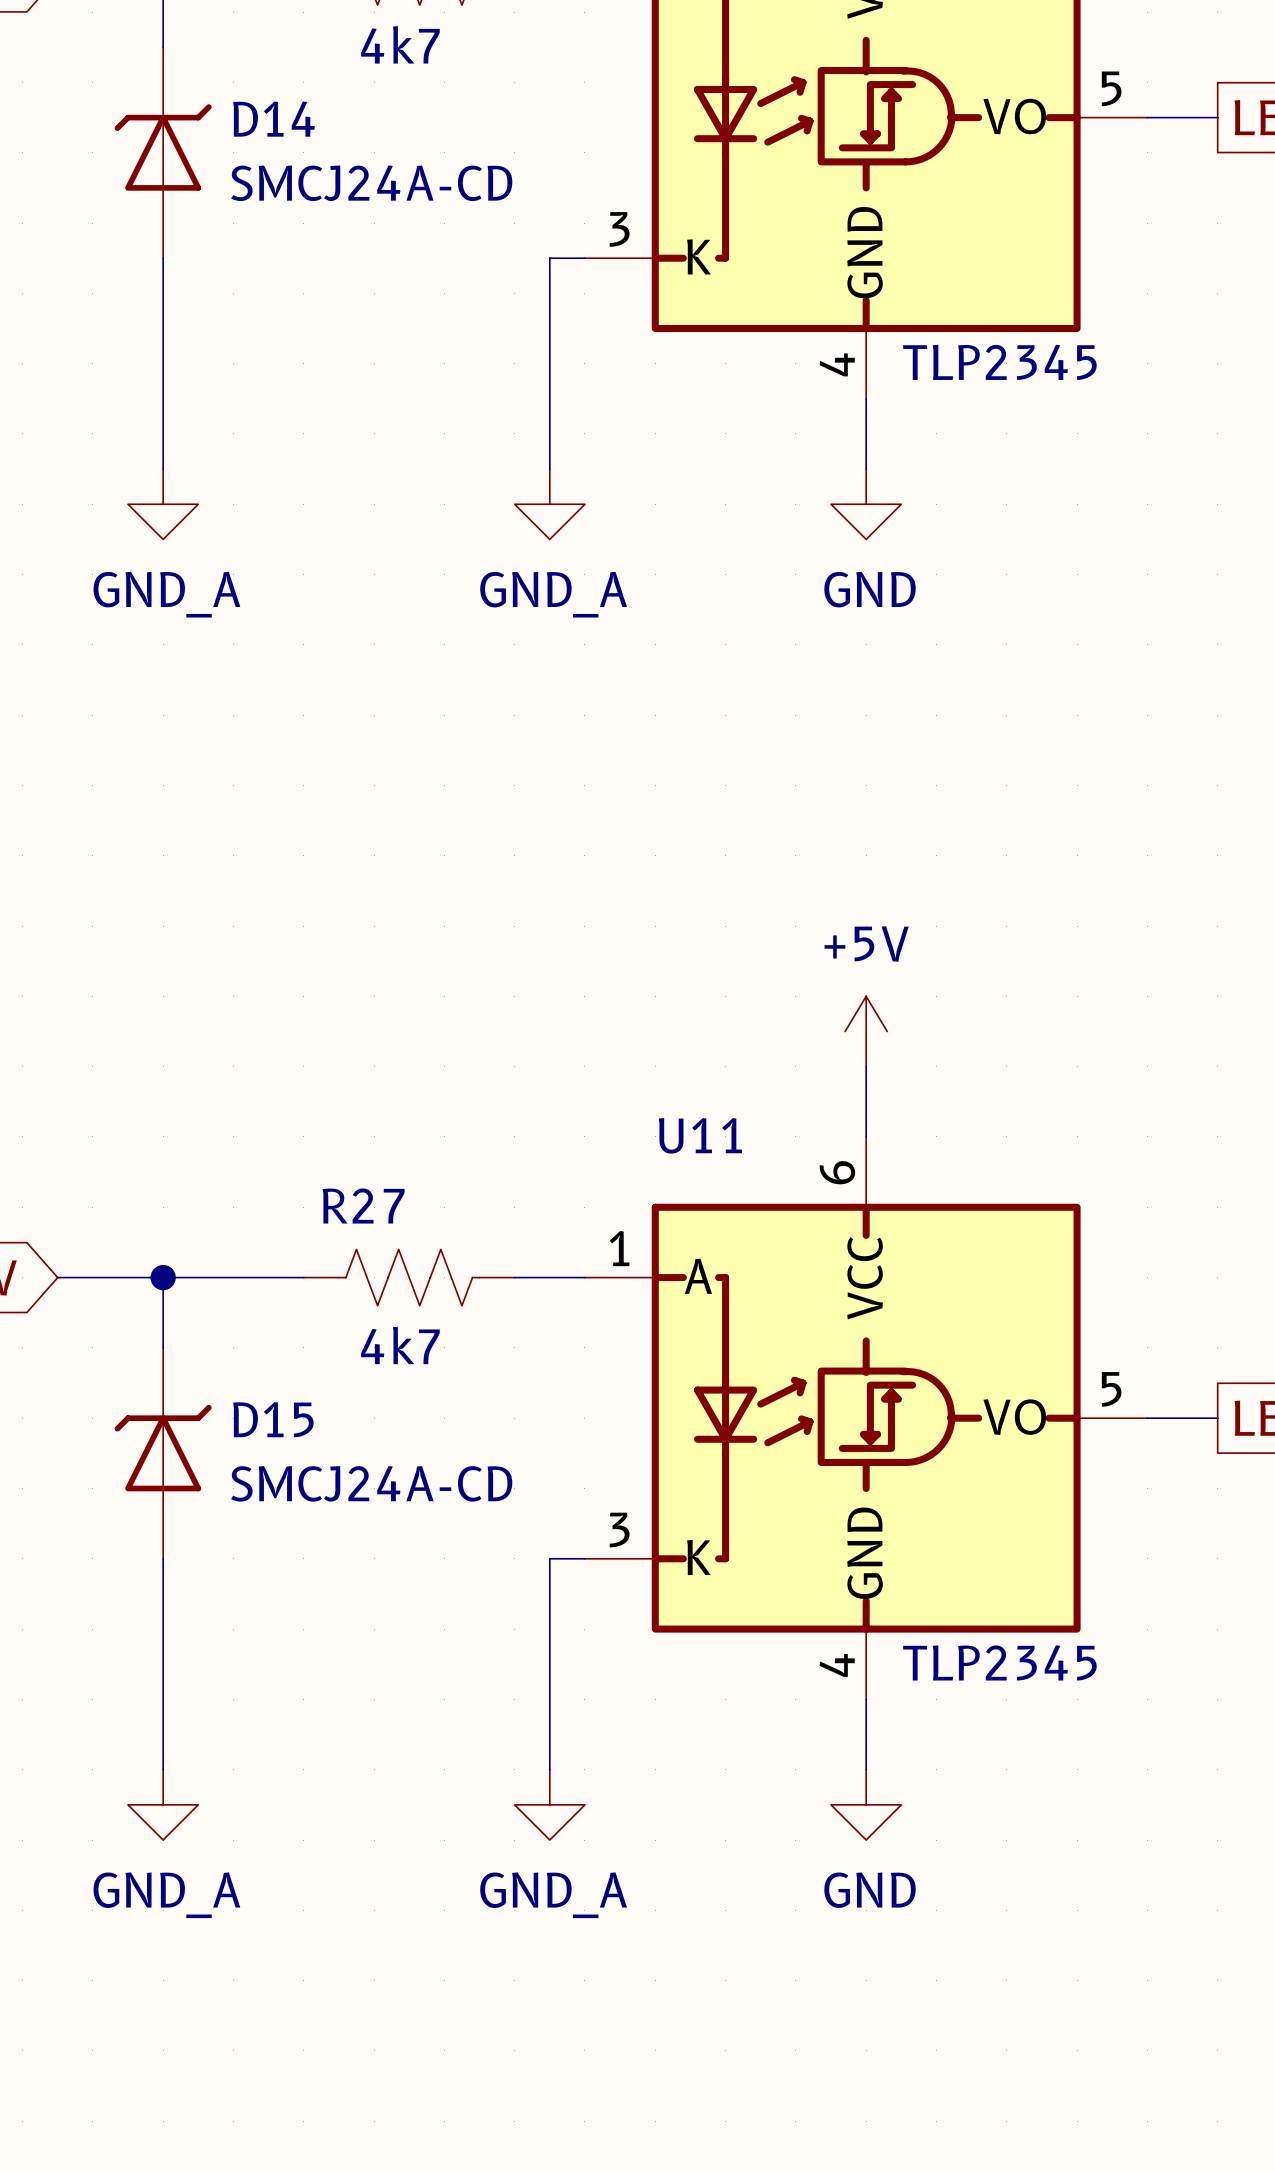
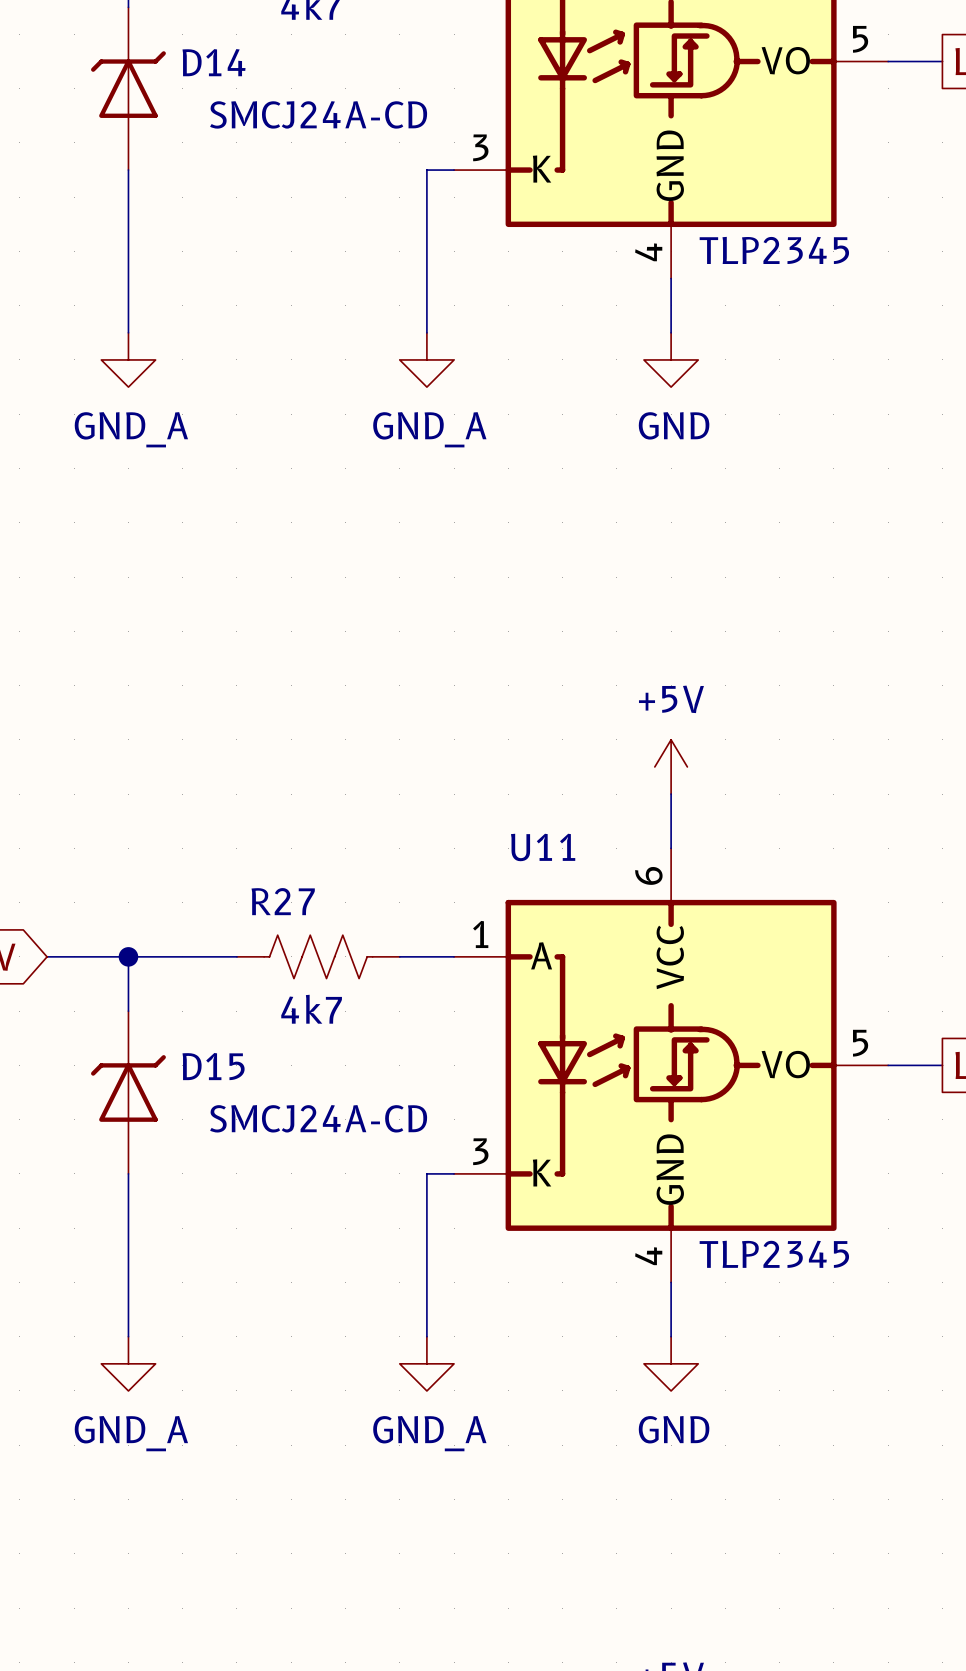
D14 value position: SMCJ24A-CD (371, 183) -> SMCJ24A-CD (318, 114)
D15 value position: SMCJ24A-CD (371, 1483) -> SMCJ24A-CD (318, 1118)

